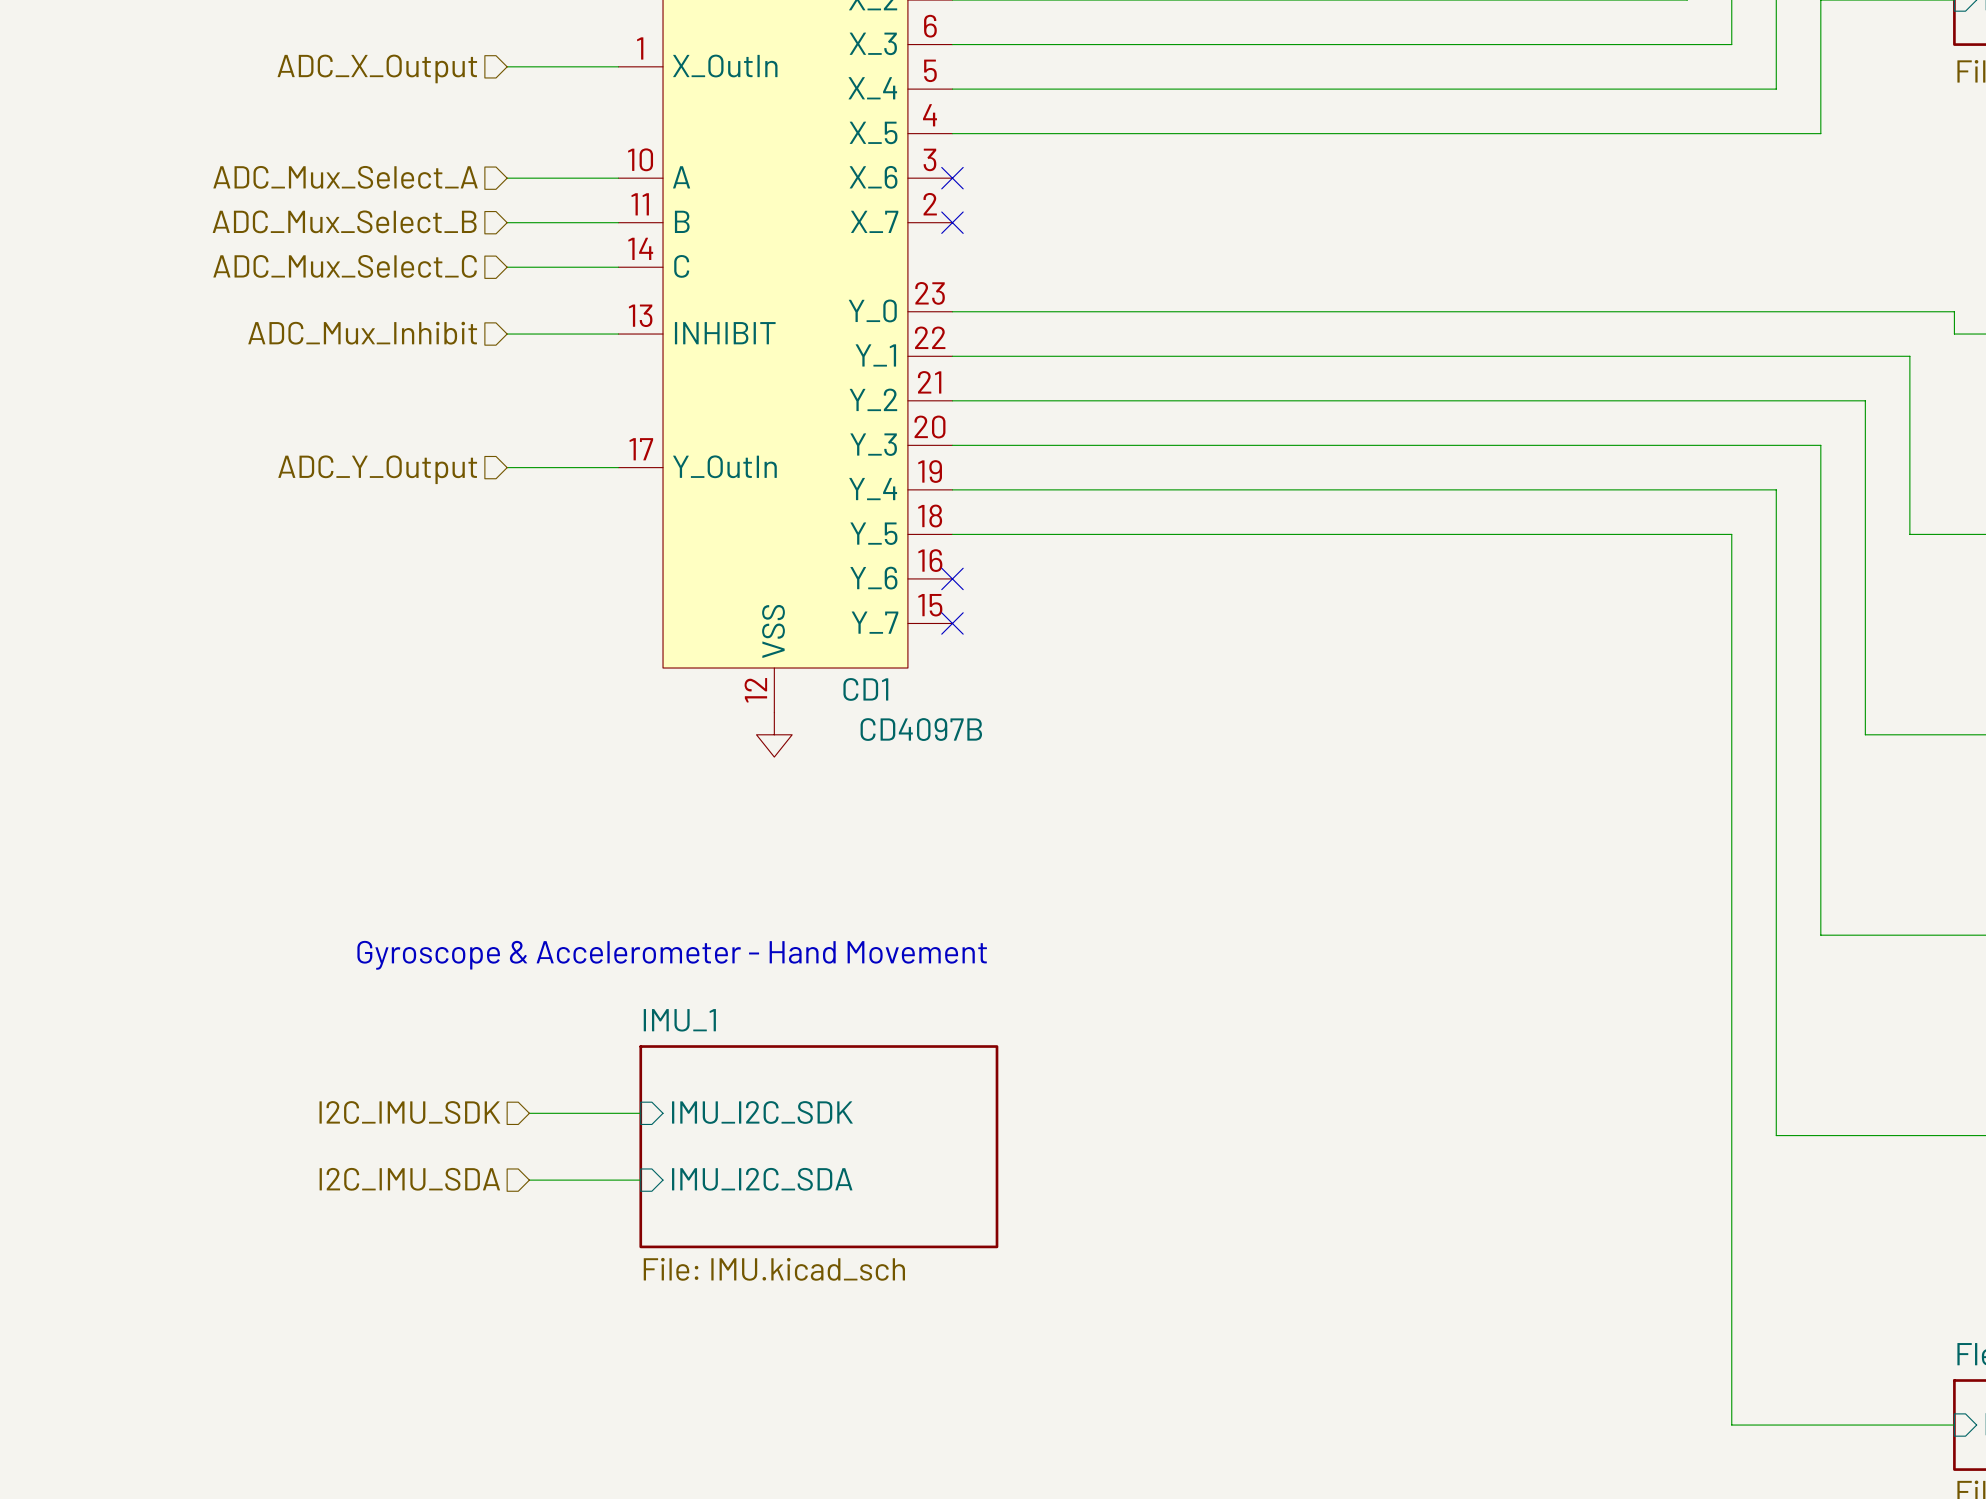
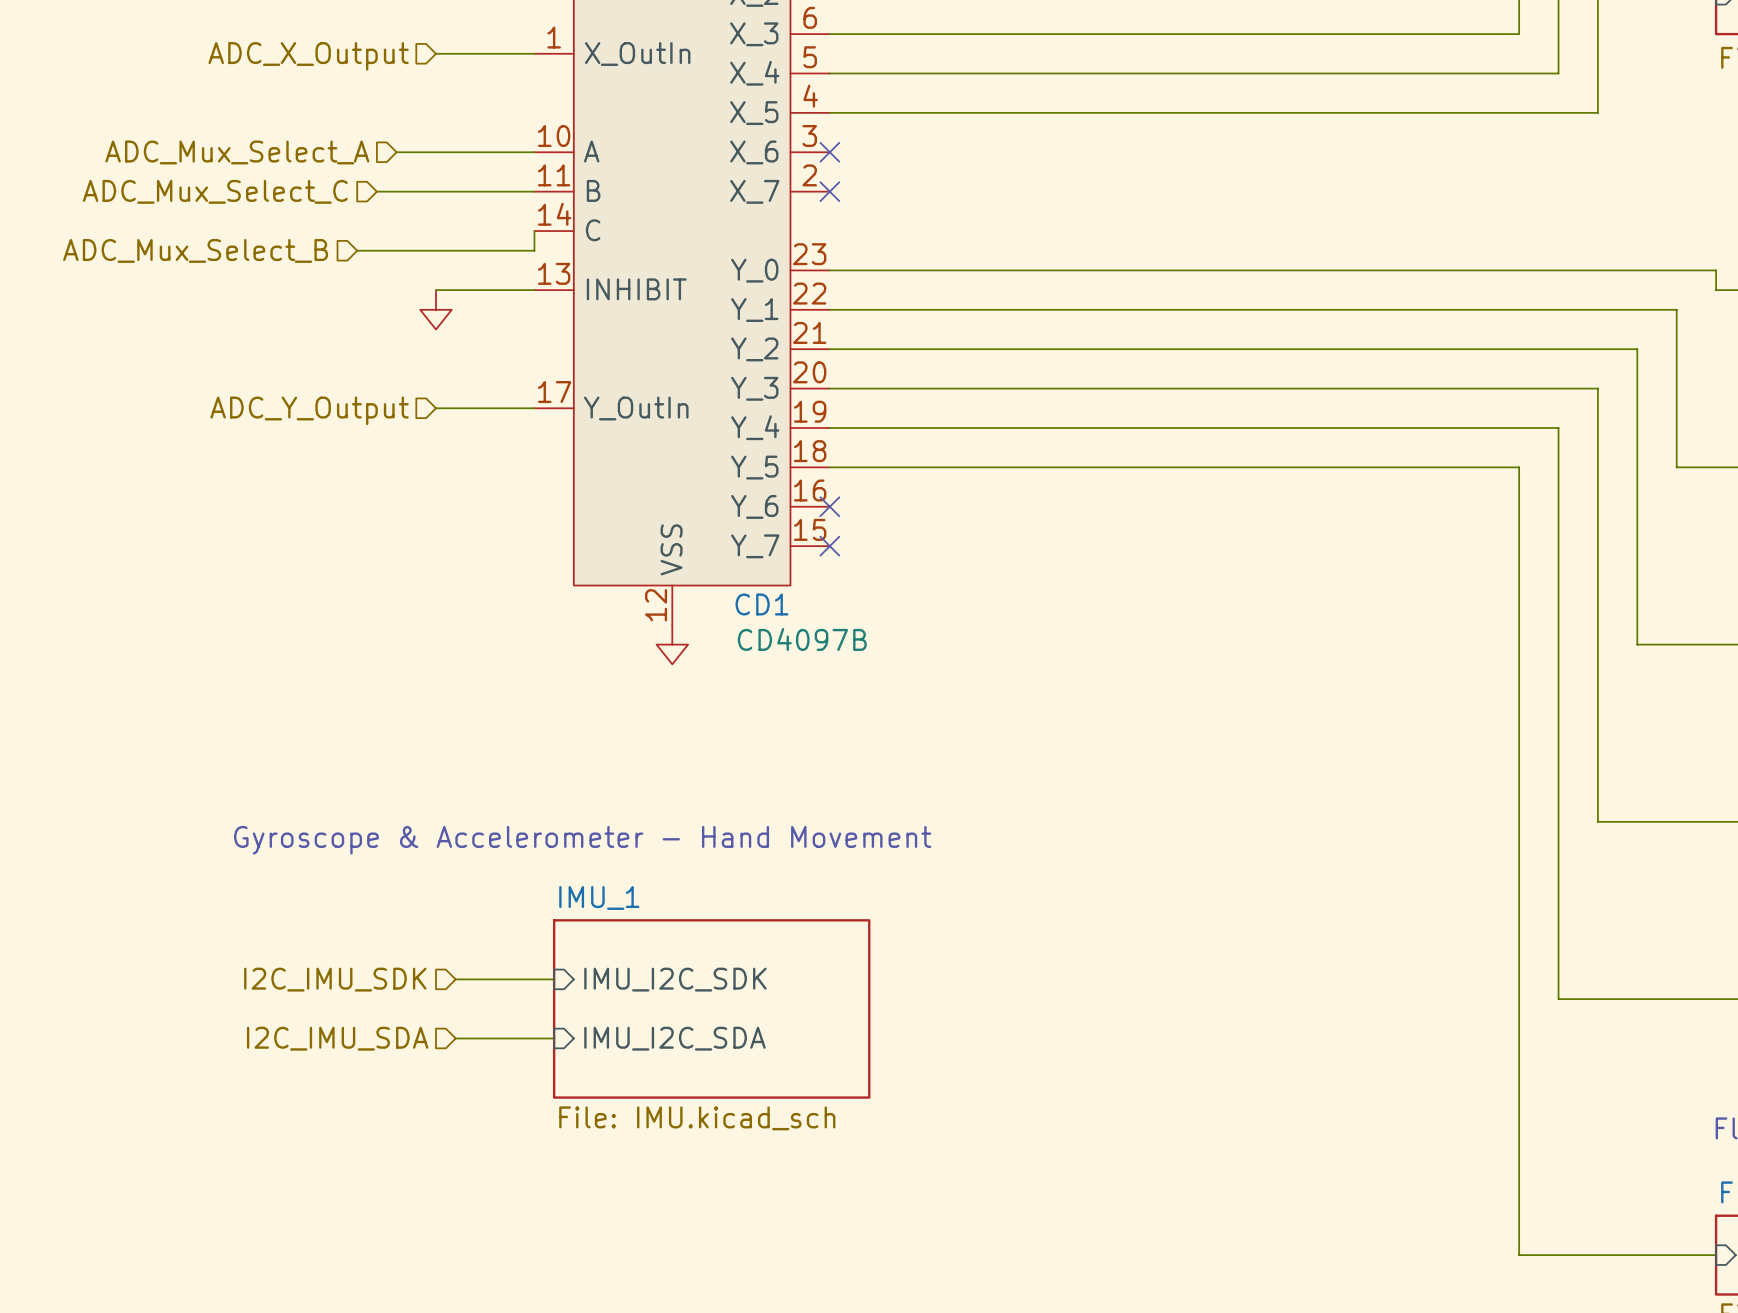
hierarchical label position: ADC_Mux_Select_A (345, 177) -> ADC_Mux_Select_A (237, 152)
wire: none -> (396, 152) (435, 152)
hierarchical label position: ADC_Mux_Select_B (344, 221) -> ADC_Mux_Select_B (195, 250)
wire: none -> (376, 191) (435, 191)
hierarchical label position: ADC_Mux_Select_C (345, 266) -> ADC_Mux_Select_C (215, 191)
wire: (507, 267) (618, 267) -> (357, 250) (534, 250) (534, 231)
hierarchical label: ADC_Mux_Inhibit (362, 333) -> none
power symbol: none -> (435, 309)

